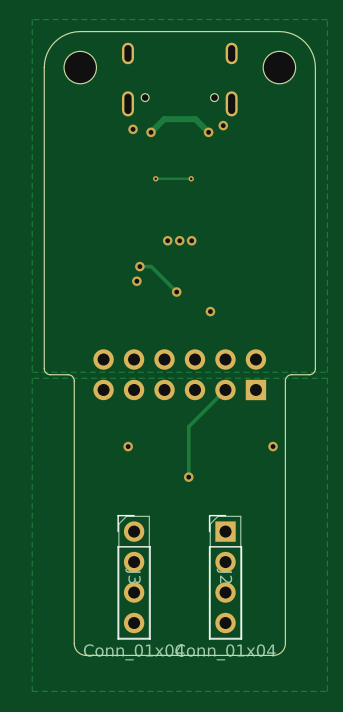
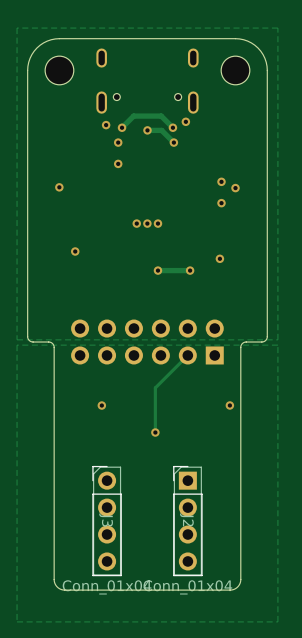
track: none -> (147, 130) (161, 130) (173, 142)
via: none -> (147, 130)
via: none -> (118, 142)
via: none -> (173, 142)
via: none -> (118, 163)
via: (155, 178) -> none
track: (191, 178) (155, 178) -> none
via: (191, 178) -> none
via: none -> (221, 181)
via: none -> (59, 187)
via: none -> (235, 188)
via: none -> (221, 203)
track: (139, 266) (151, 266) (176, 292) -> none
via: (139, 266) -> none
via: none -> (75, 251)
via: none -> (219, 258)
via: (136, 281) -> none
via: (176, 292) -> none
via: none -> (157, 270)
track: none -> (190, 270) (157, 270)
via: none -> (190, 270)
via: (210, 311) -> none

